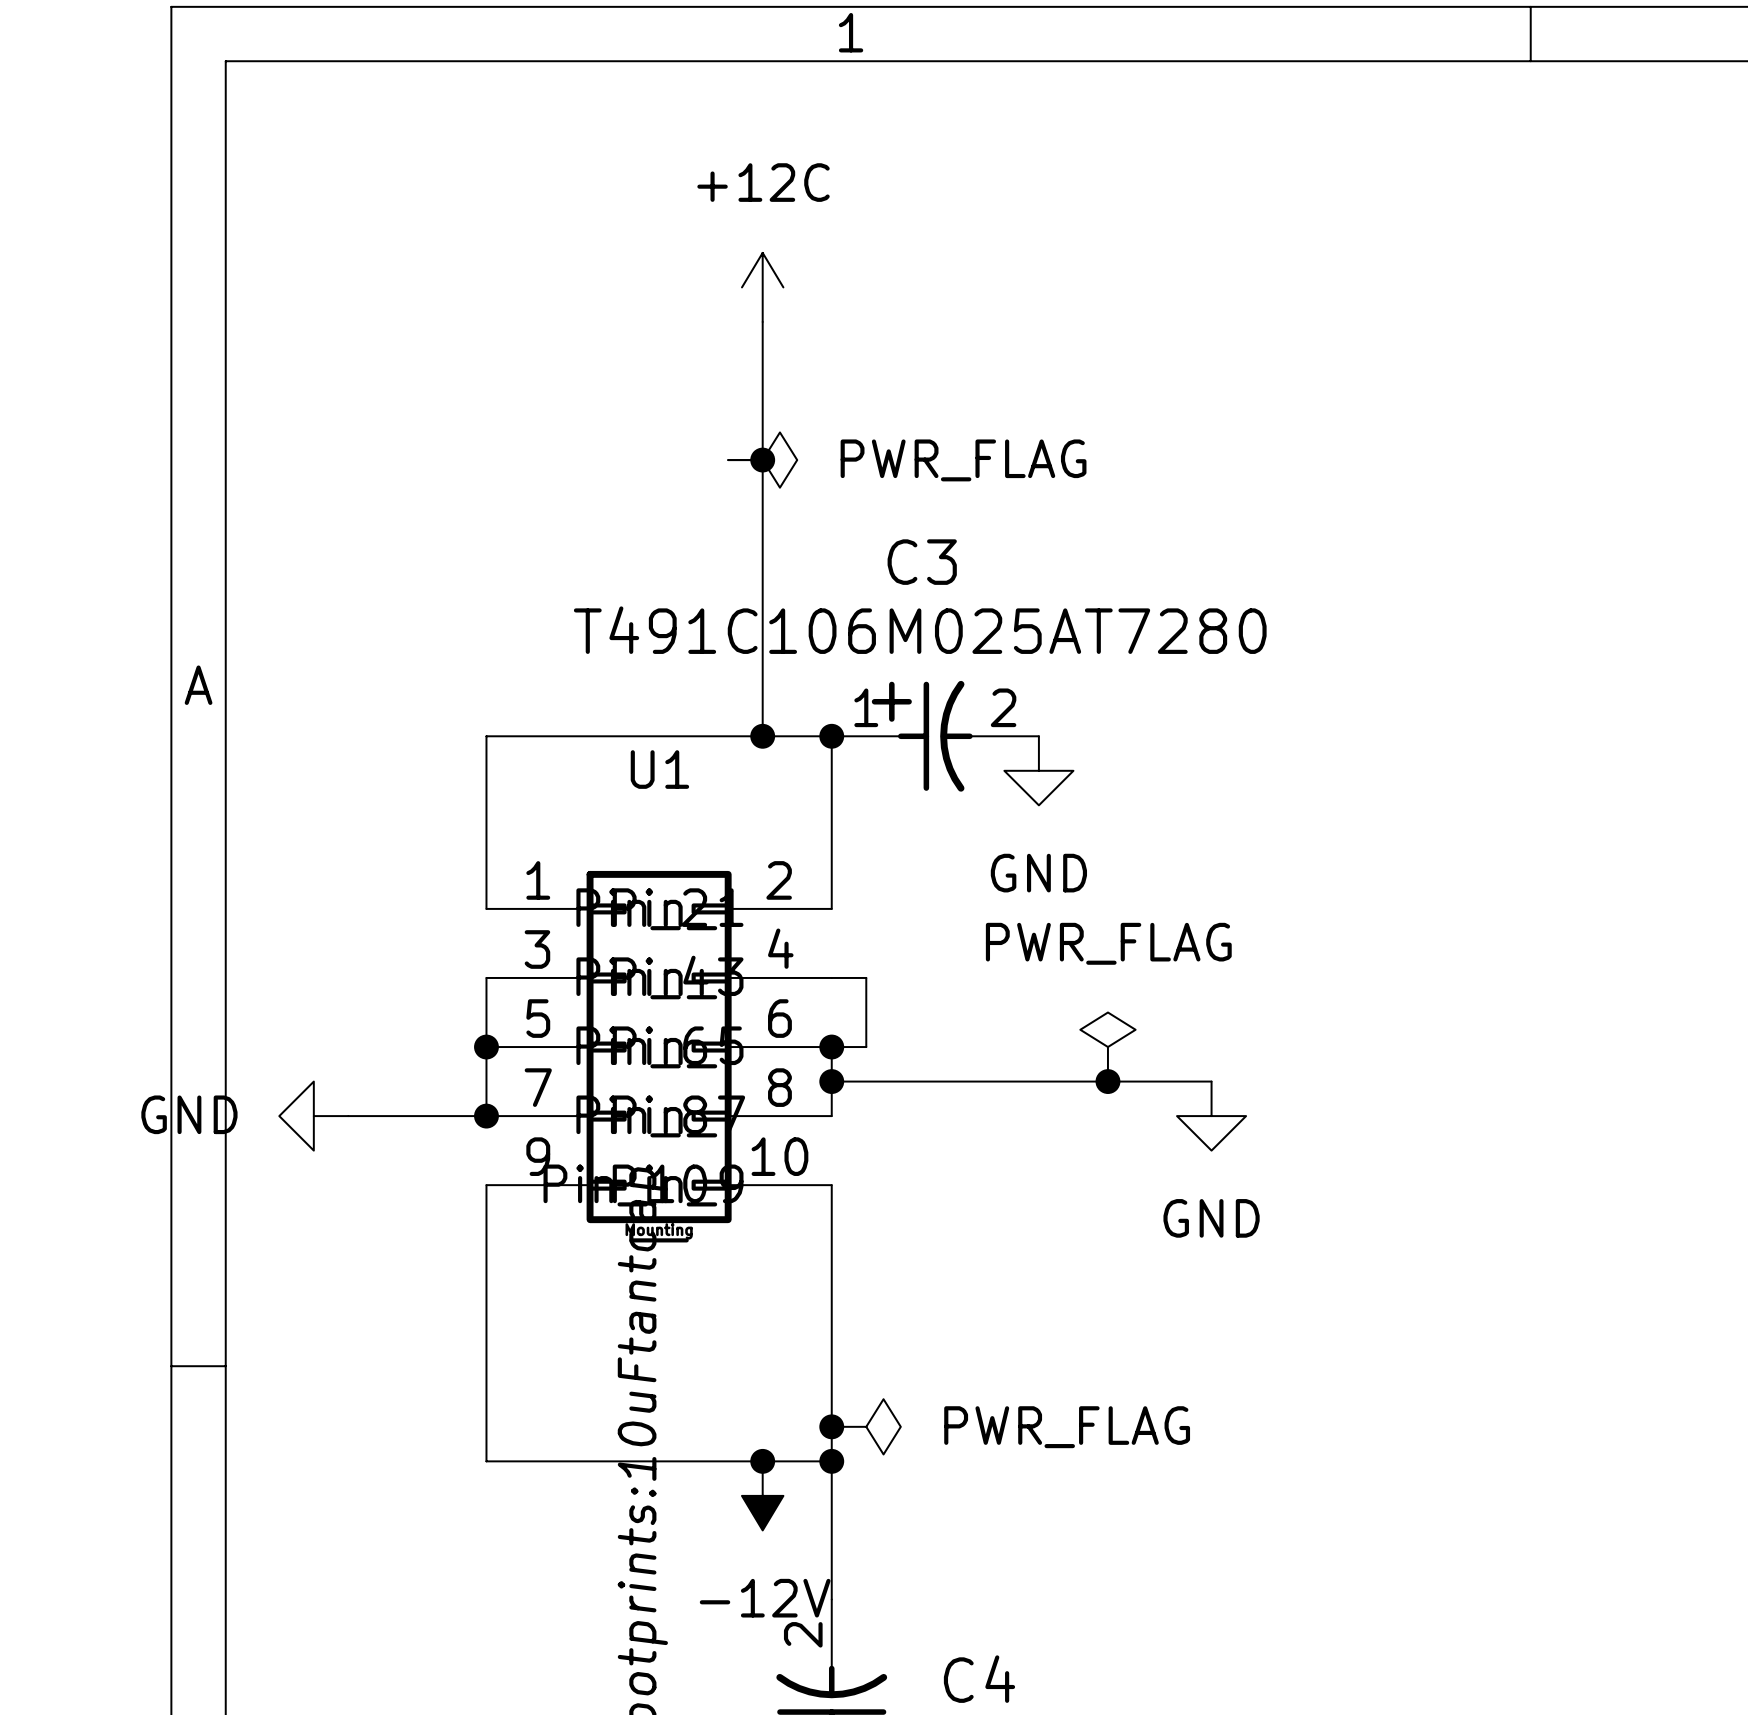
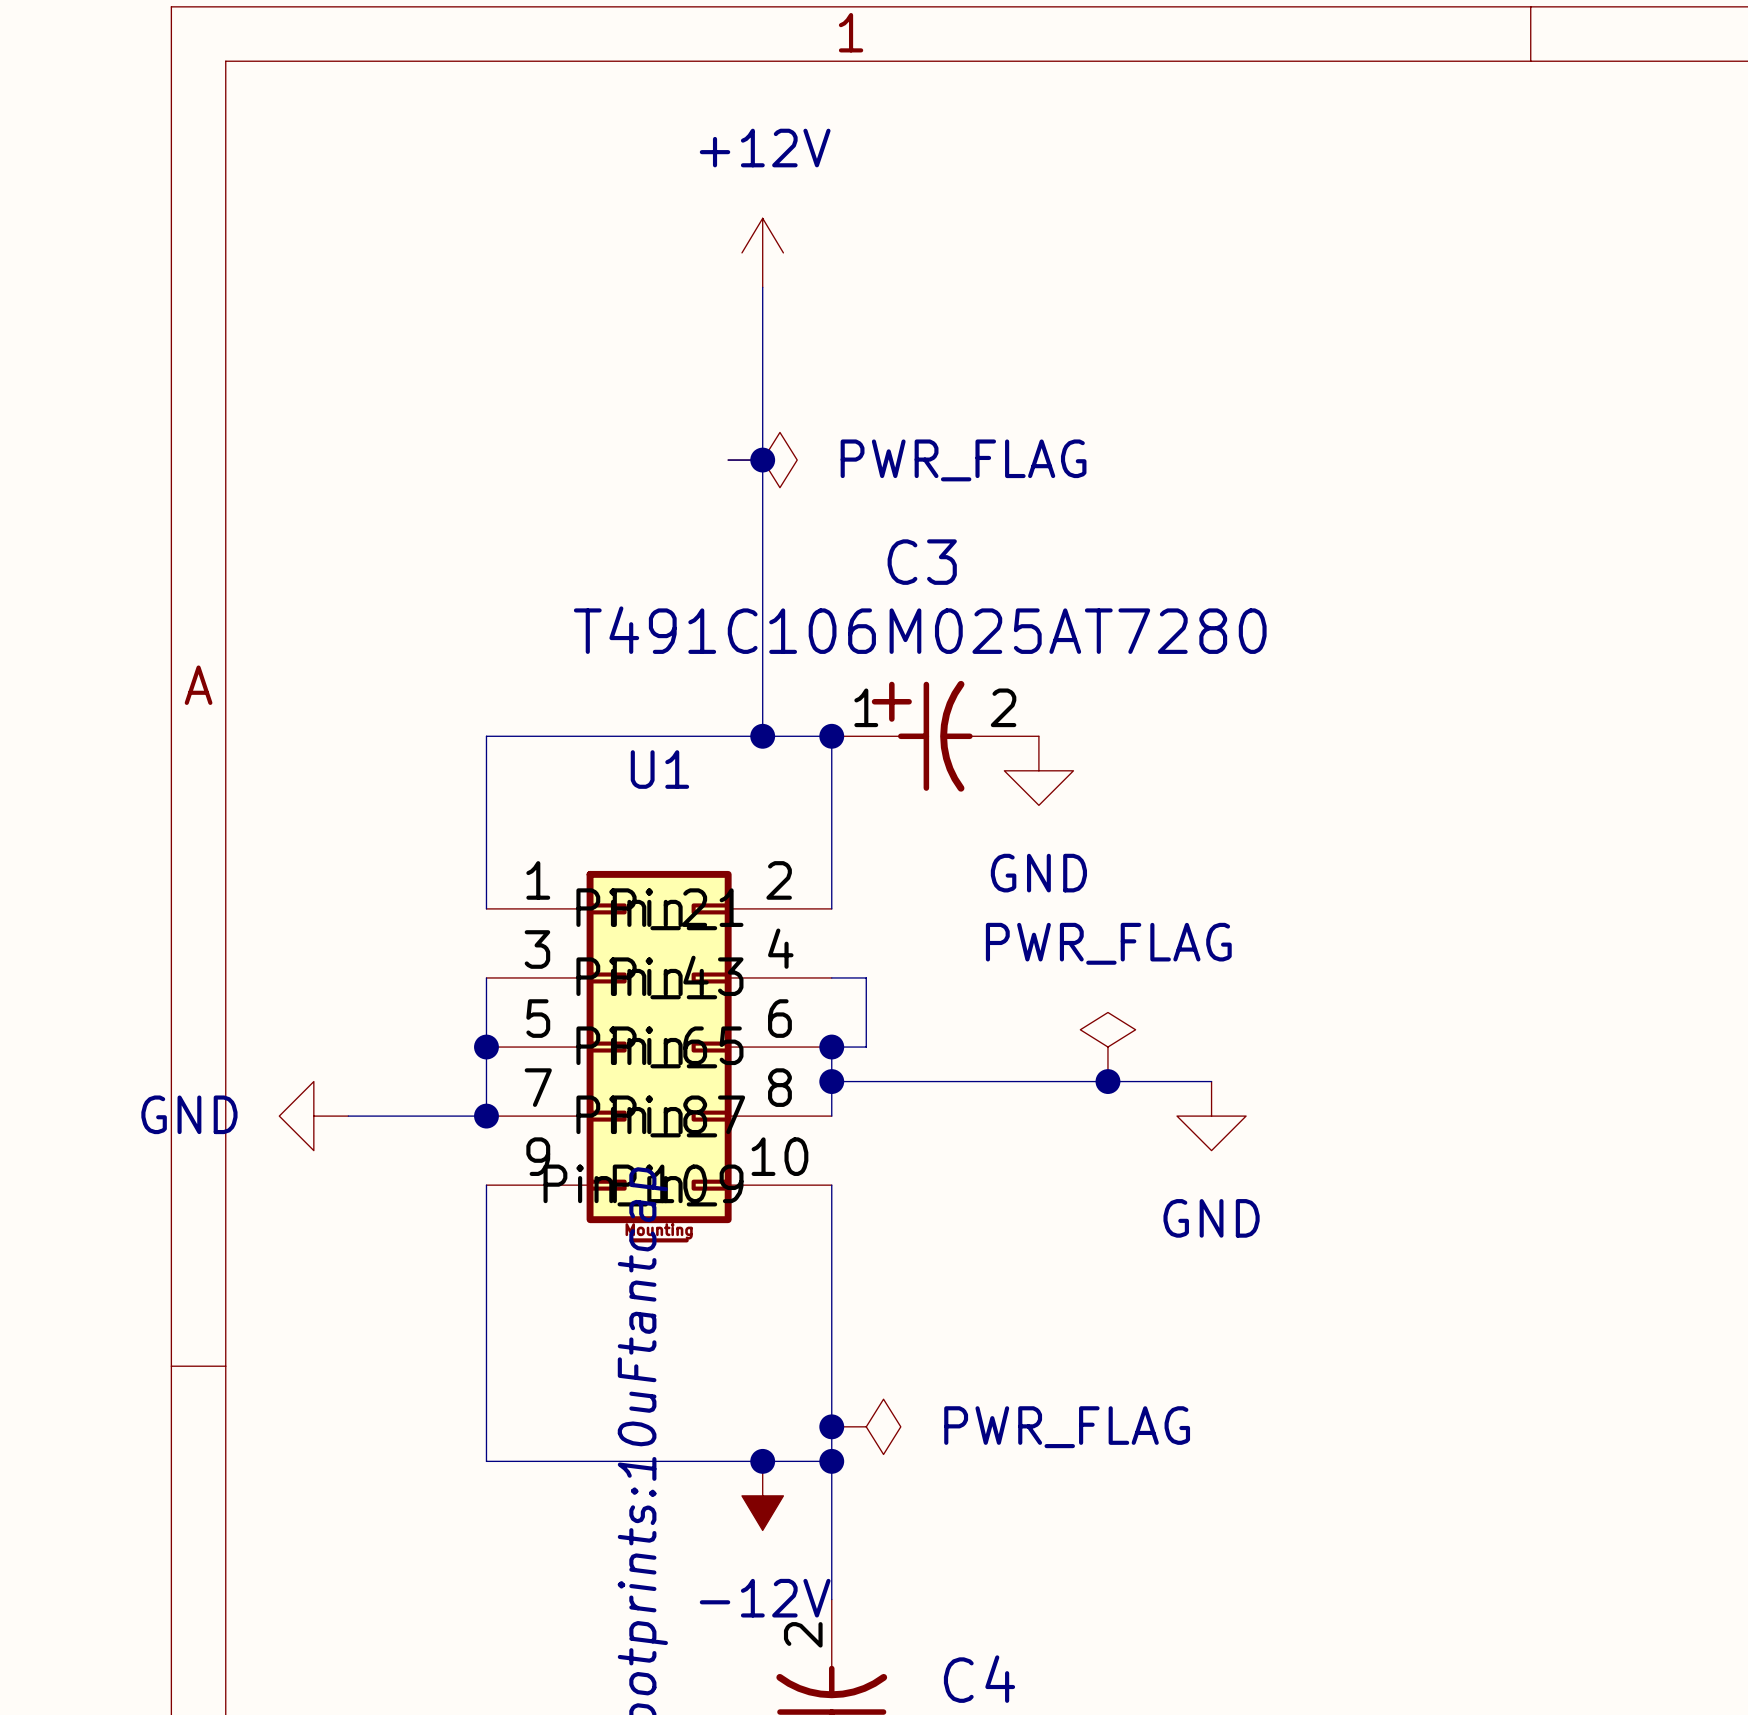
power symbol: none -> +12V (762, 252)
power symbol: +12C (762, 287) -> none

